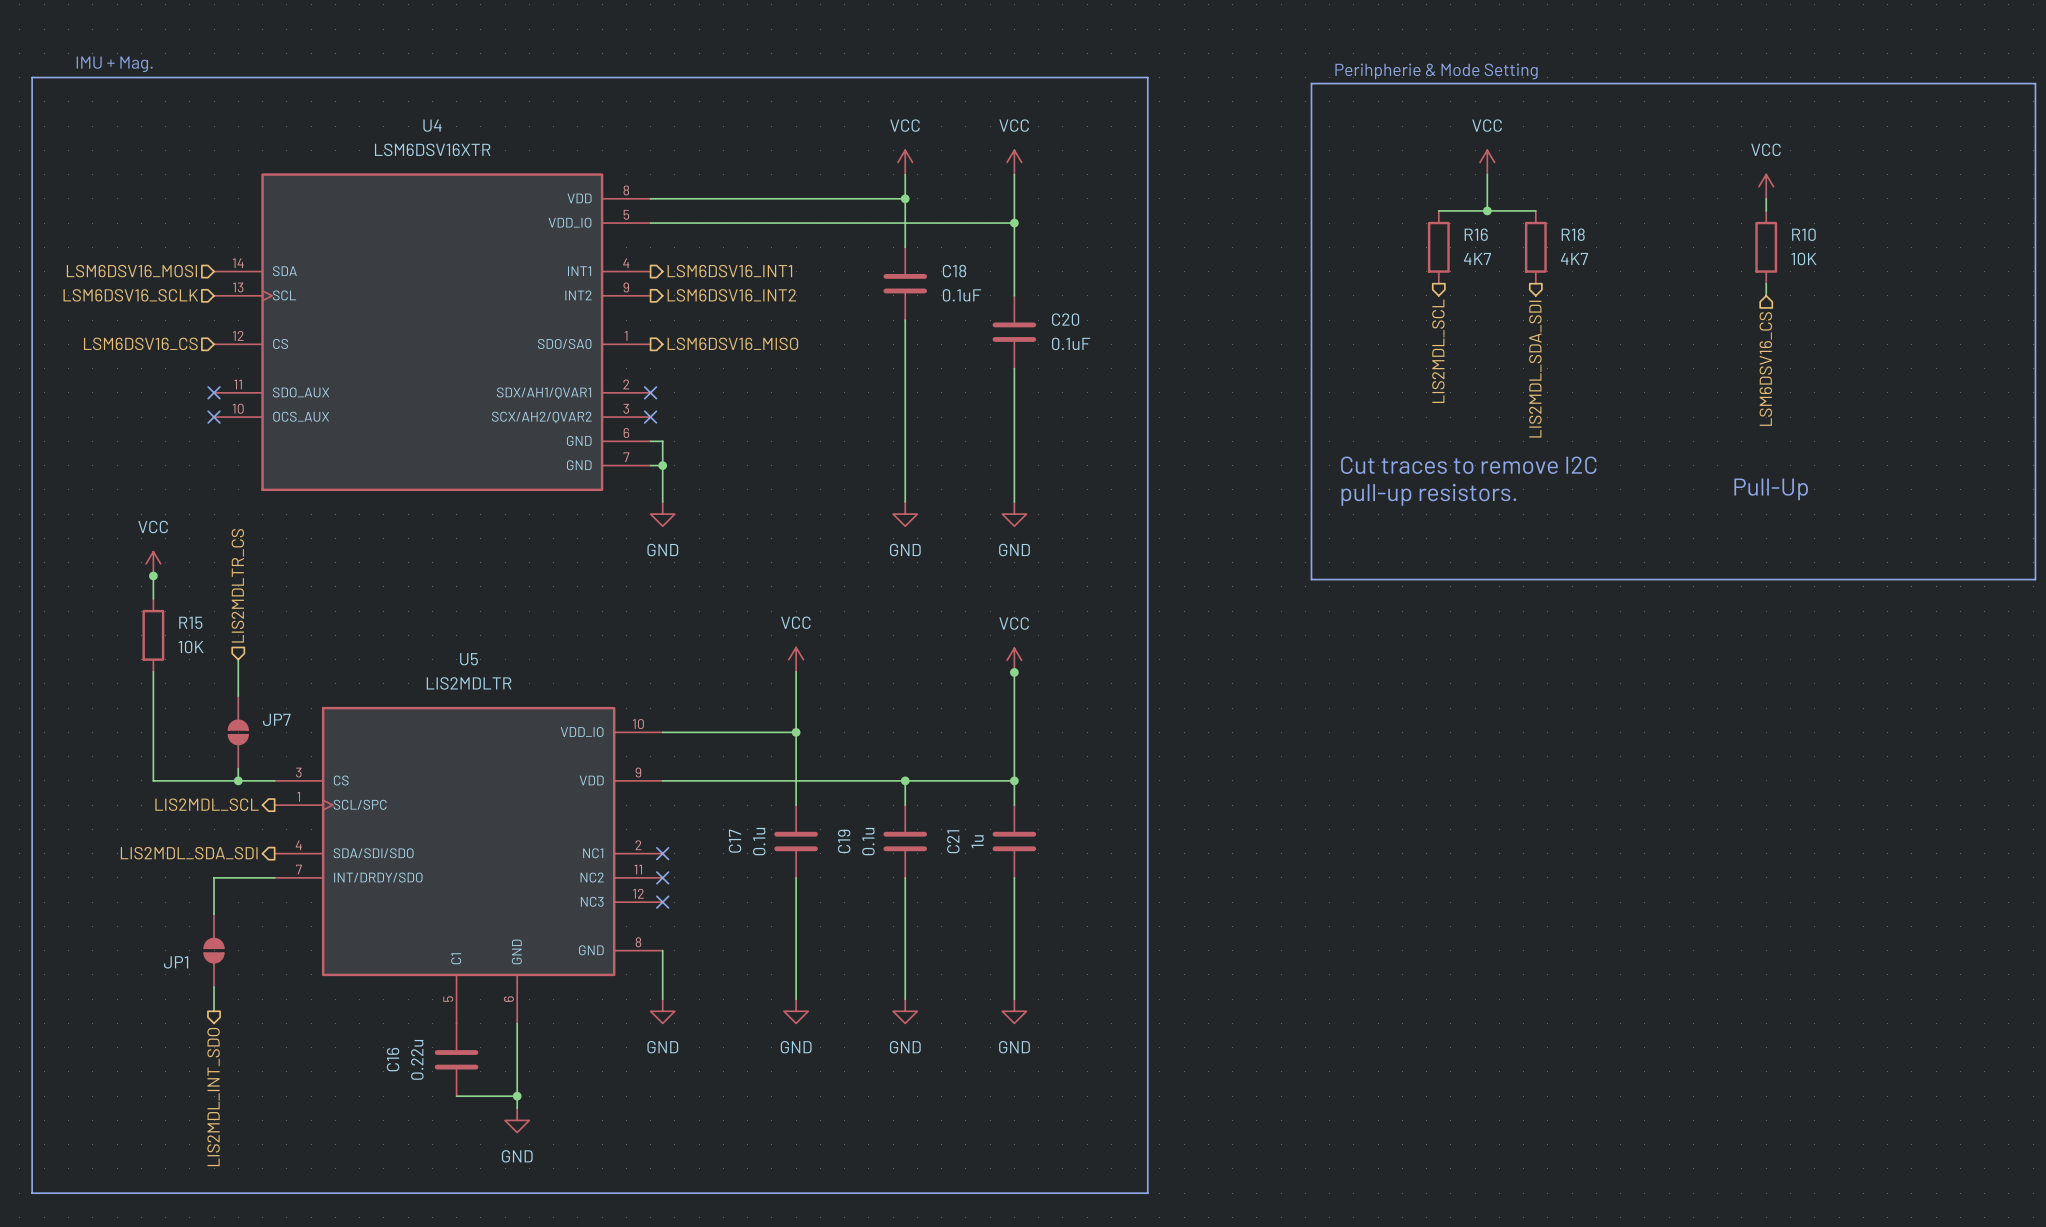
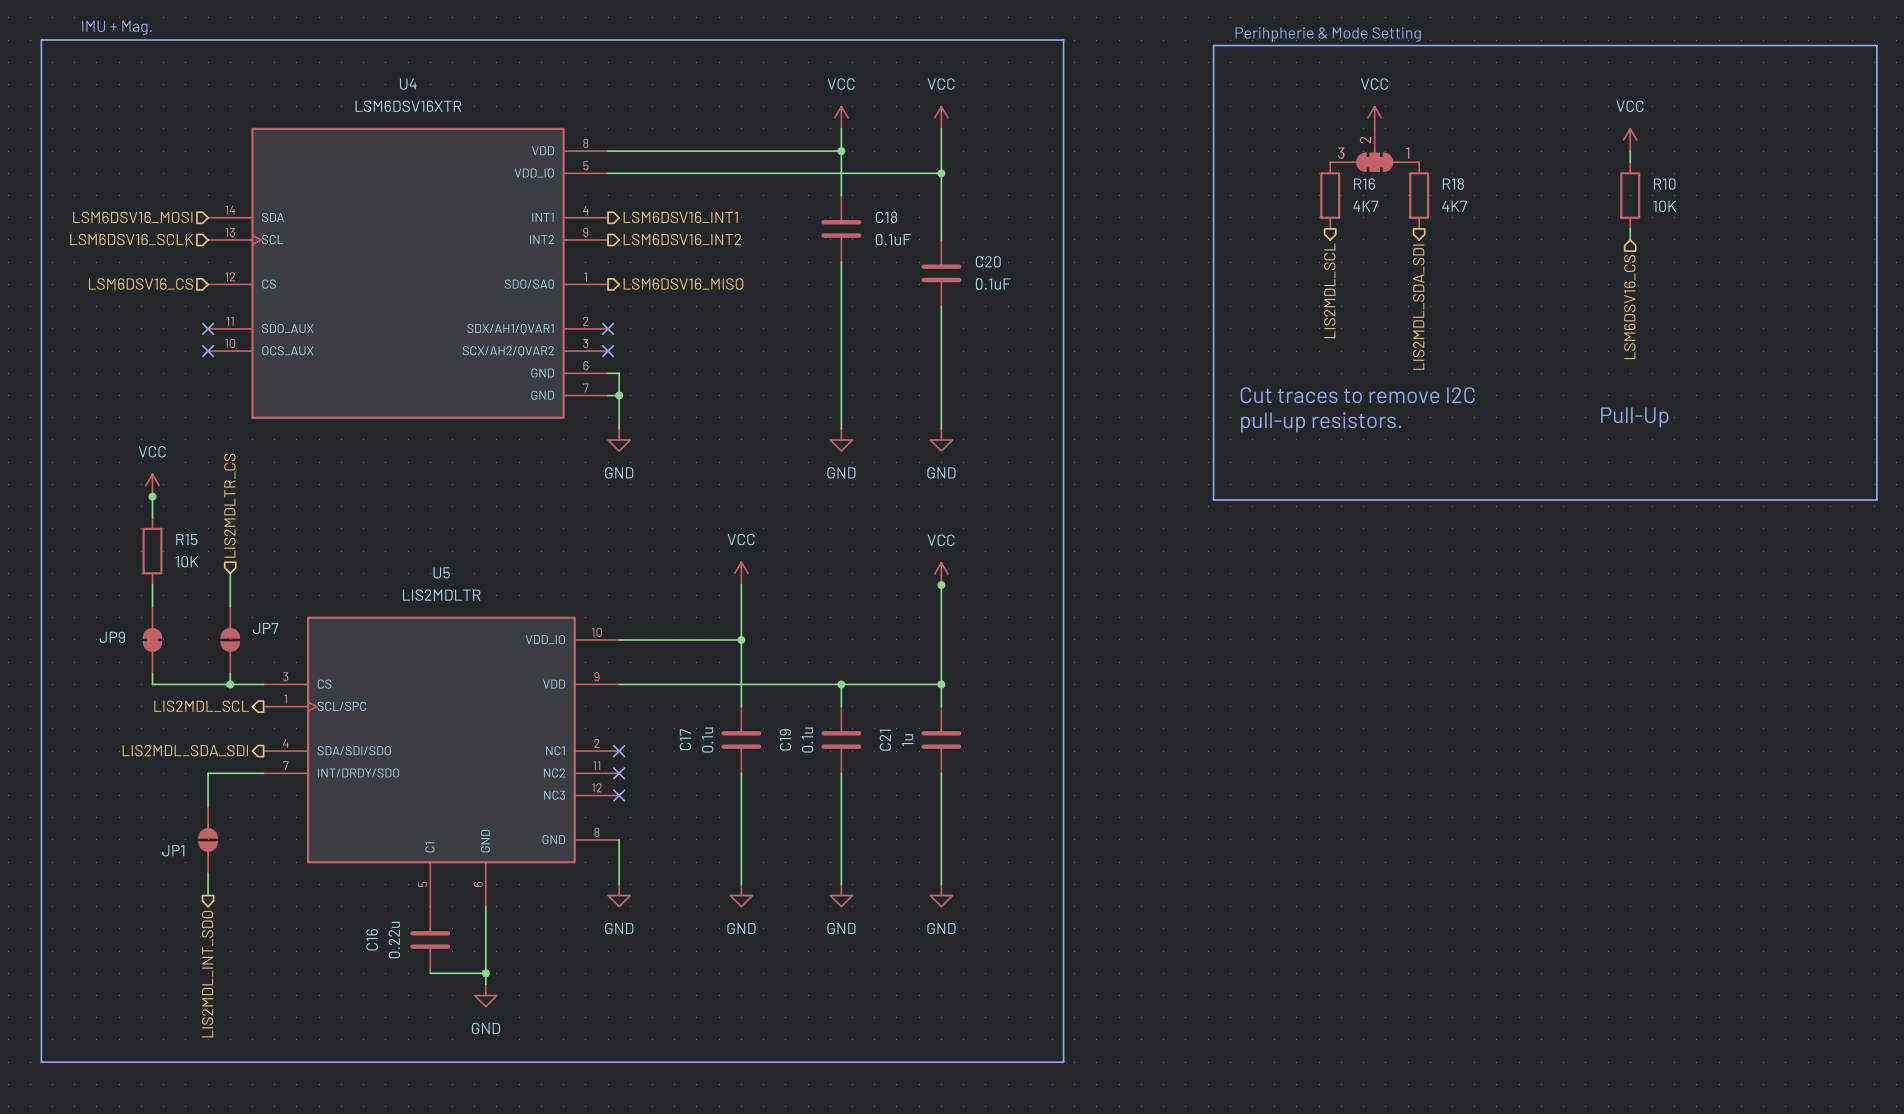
part: none -> (1374, 150)
junction: (1487, 210) -> none
JP9: none -> (152, 639)

